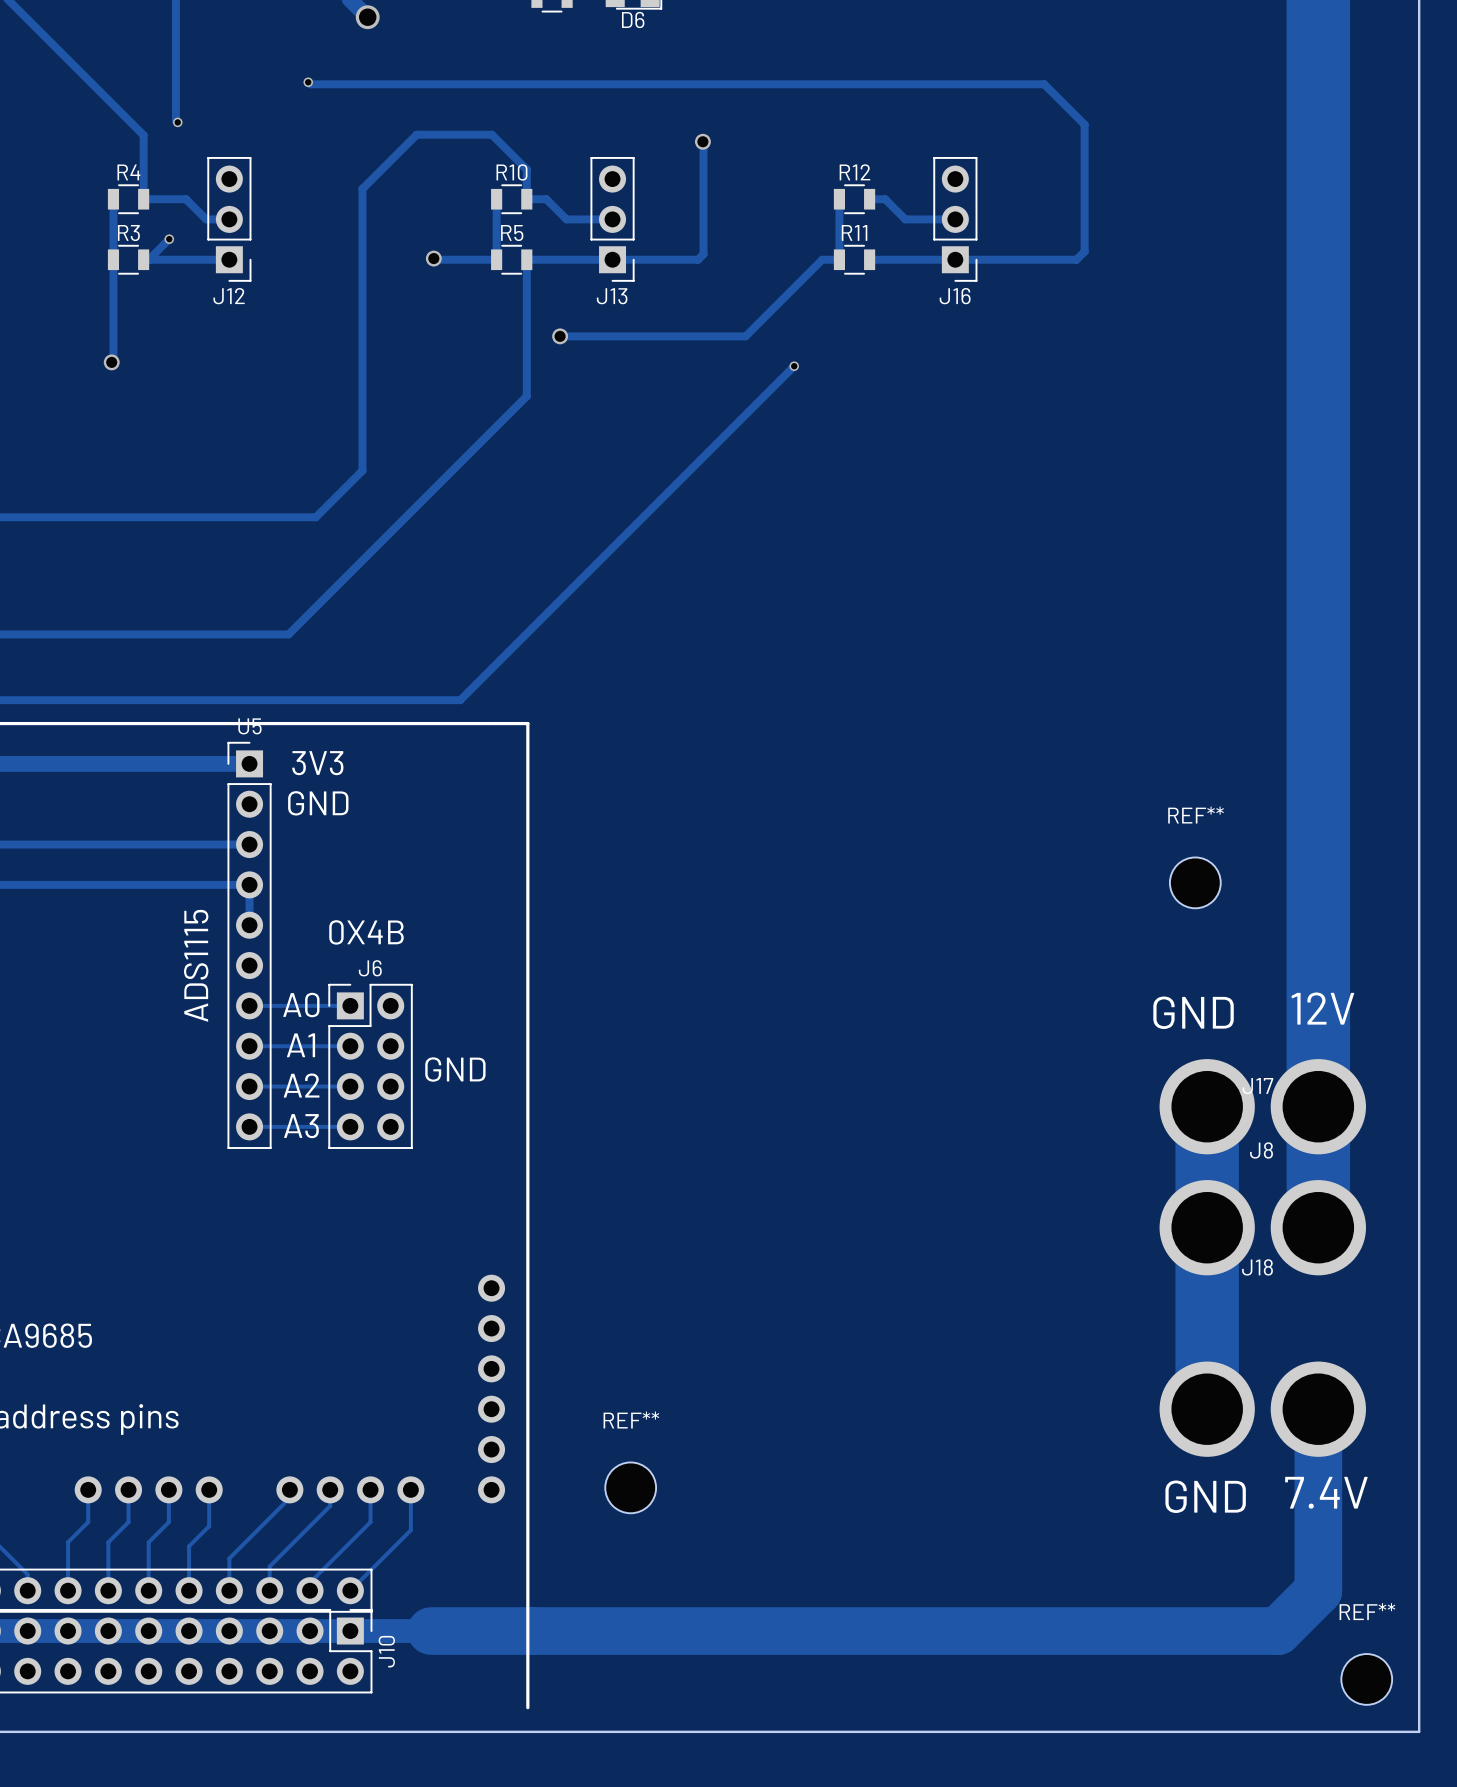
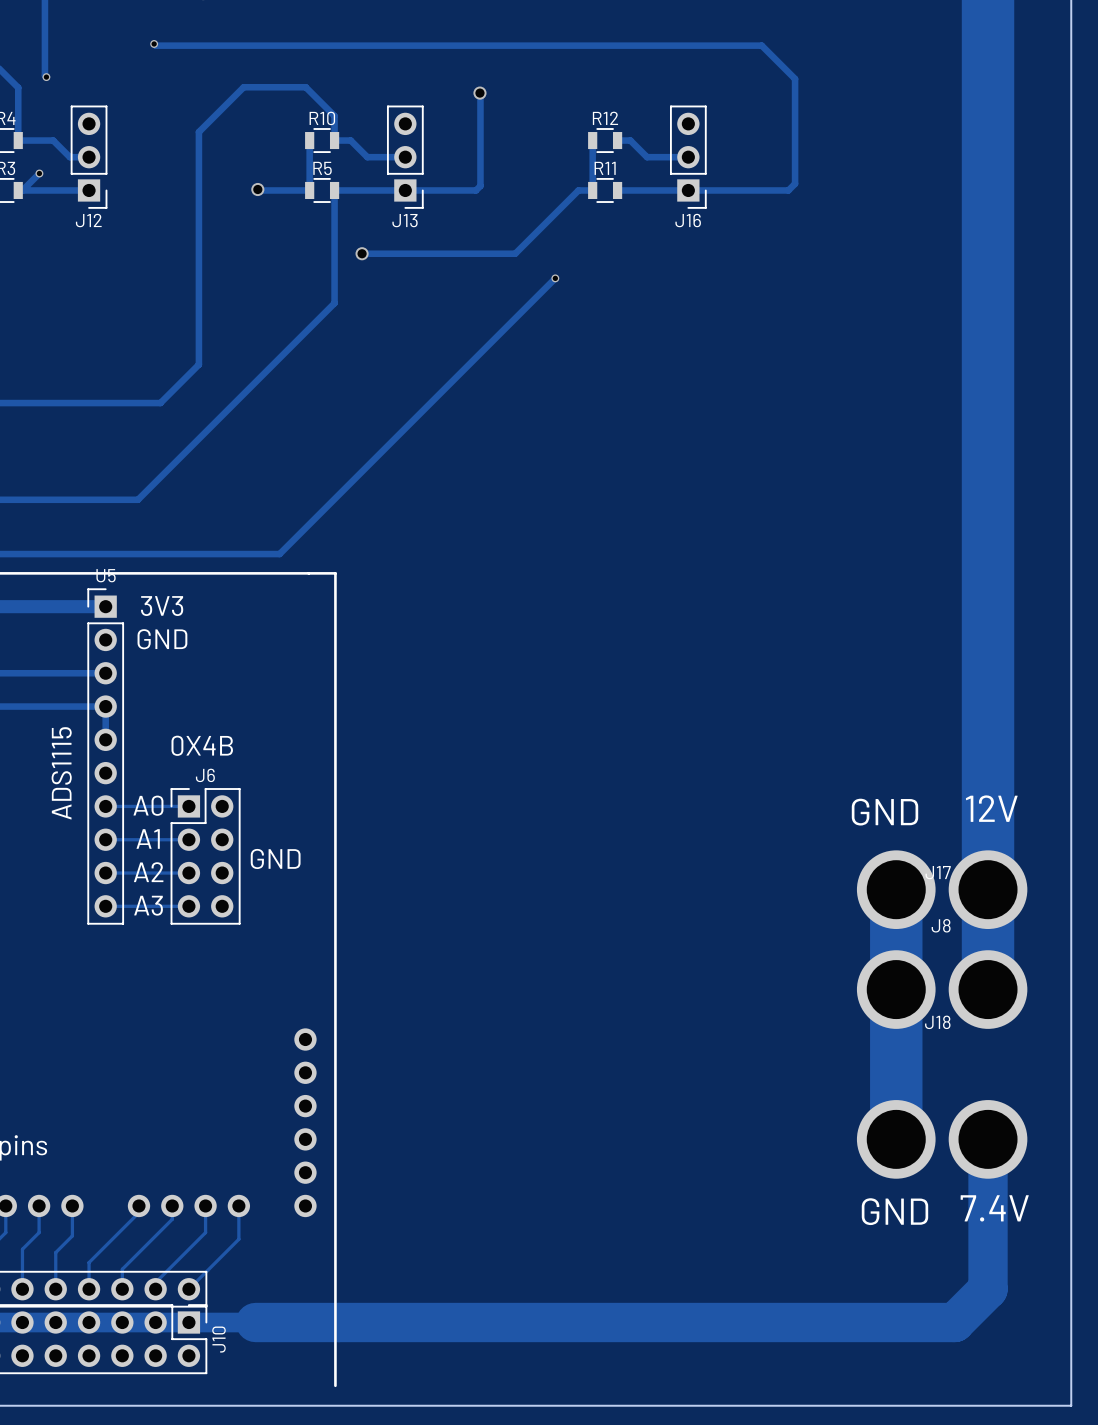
REF**: (1195, 882) -> none
REF**: (630, 1487) -> none
REF**: (1366, 1679) -> none

